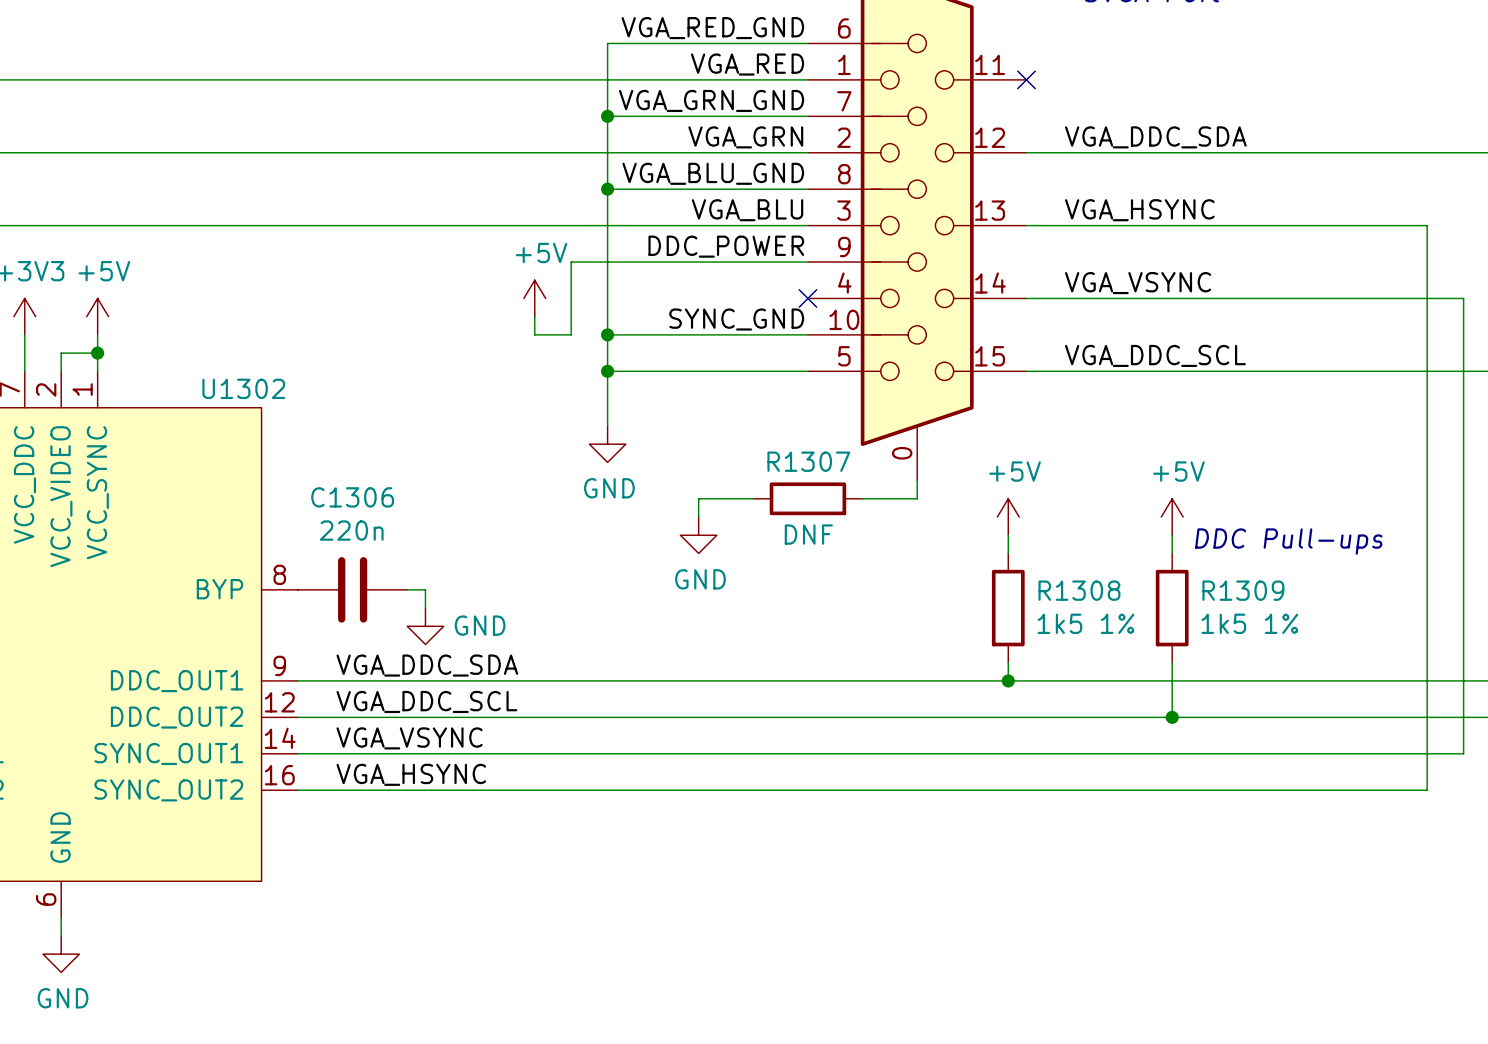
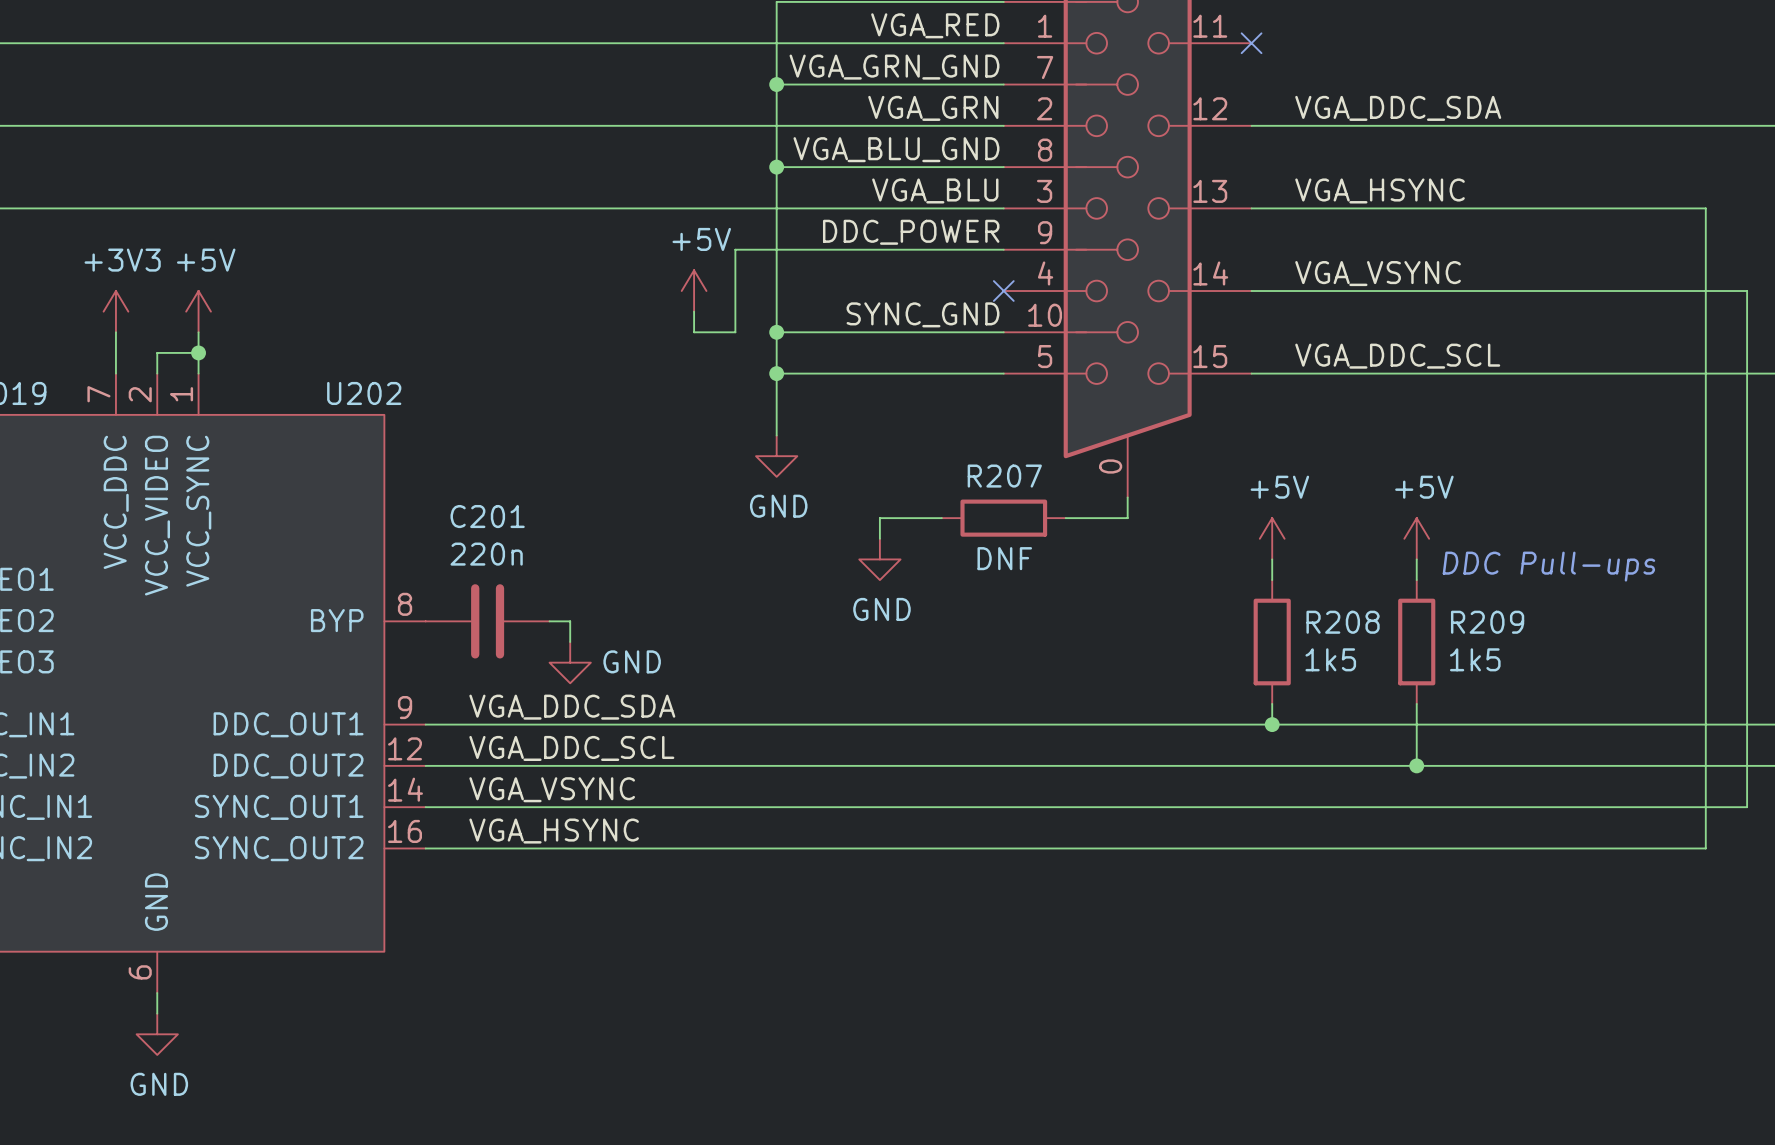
U1302 name: U1302 (243, 388) -> U202 (364, 393)
R1307 name: R1307 (808, 461) -> R207 (1004, 476)
C1306 name: C1306 (352, 497) -> C201 (487, 516)
power symbol position: +5V (1008, 517) -> +5V (1272, 538)
wire: (1008, 535) (1008, 553) -> (1272, 559) (1272, 580)
R1309 name: R1309 (1243, 590) -> R209 (1487, 622)
R1308: 1k5 1% (1008, 608) -> none
R208: none -> 1k5 (1272, 642)
R1309 value: 1k5 1% (1249, 623) -> 1k5 (1475, 659)
wire: (1008, 662) (1008, 680) -> (1272, 703) (1272, 724)
junction position: (1008, 680) -> (1272, 724)

